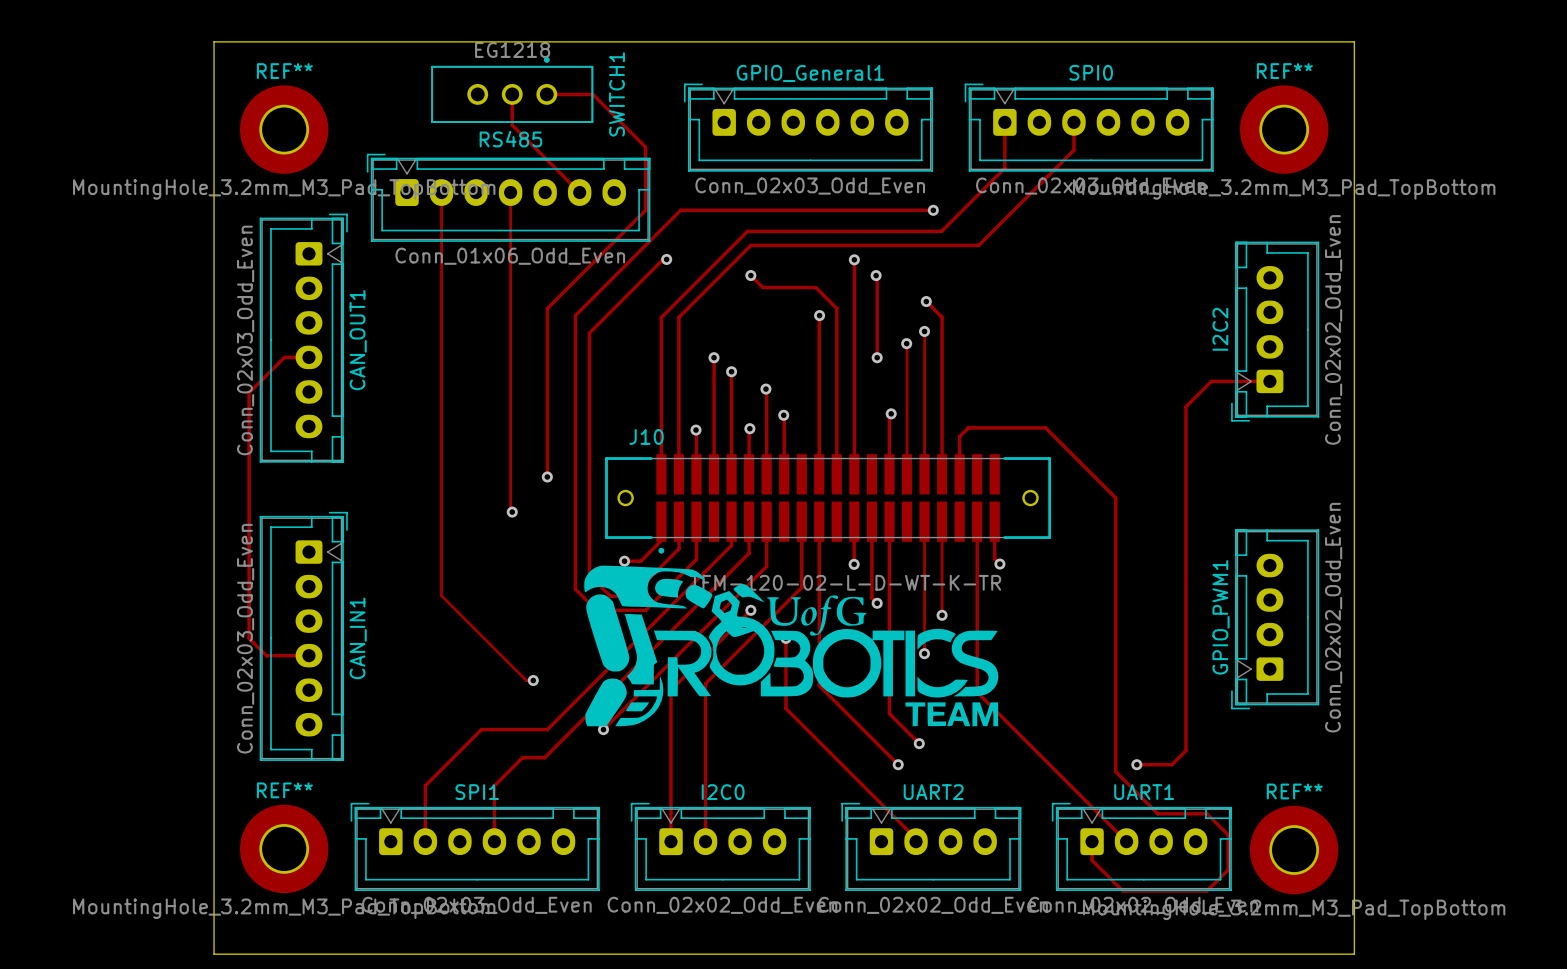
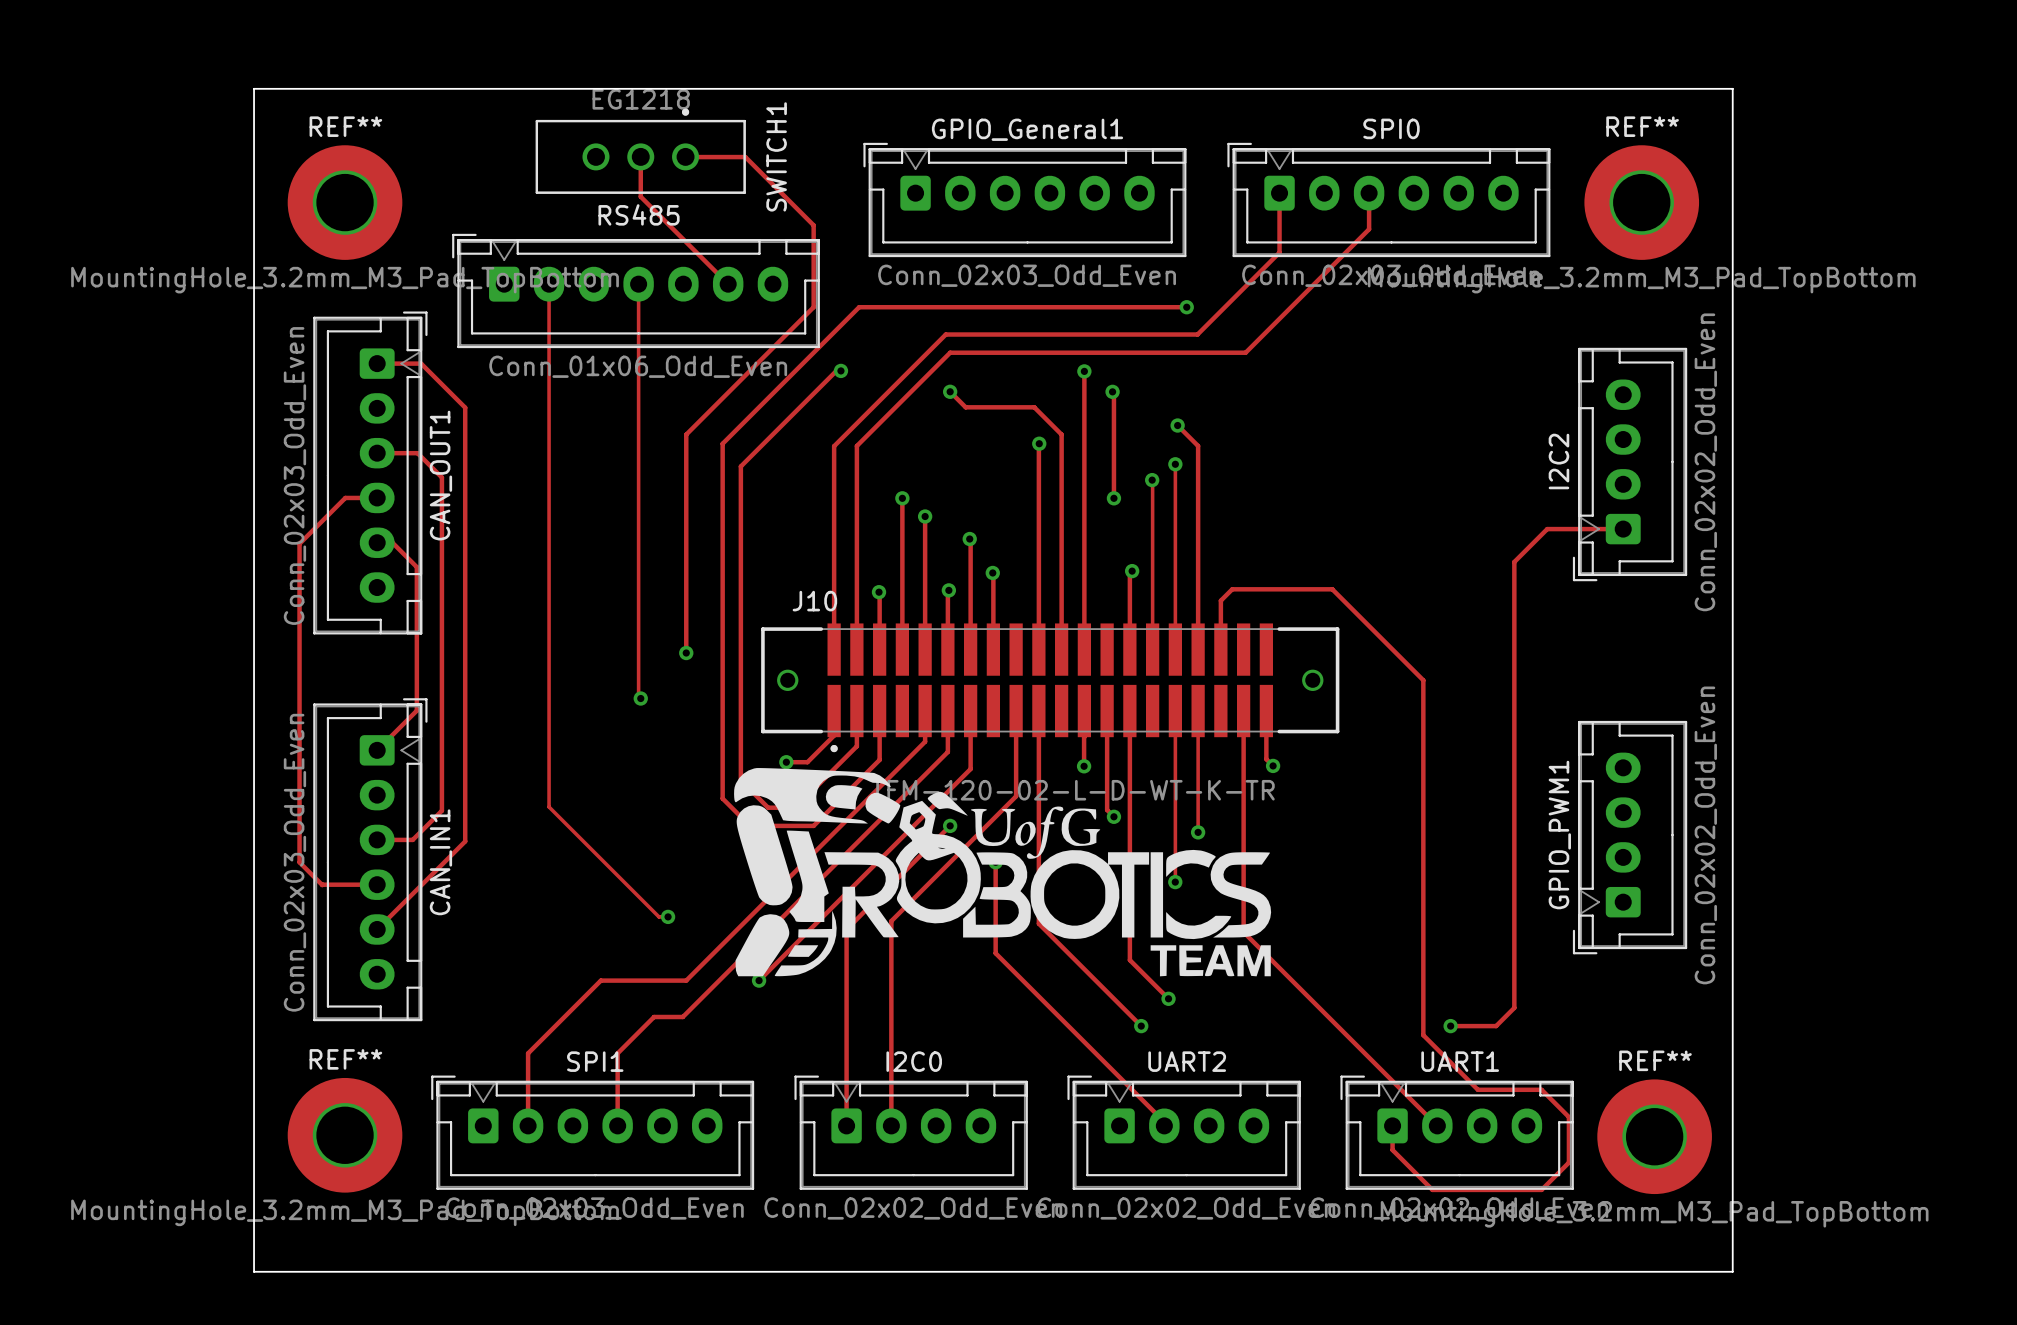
track: none -> (377, 363) (421, 363) (465, 407) (465, 841) (377, 929)
track: none -> (377, 453) (417, 453) (441, 477) (441, 810) (412, 839) (377, 839)
track: none -> (377, 542) (392, 542) (416, 567) (416, 710) (377, 750)

